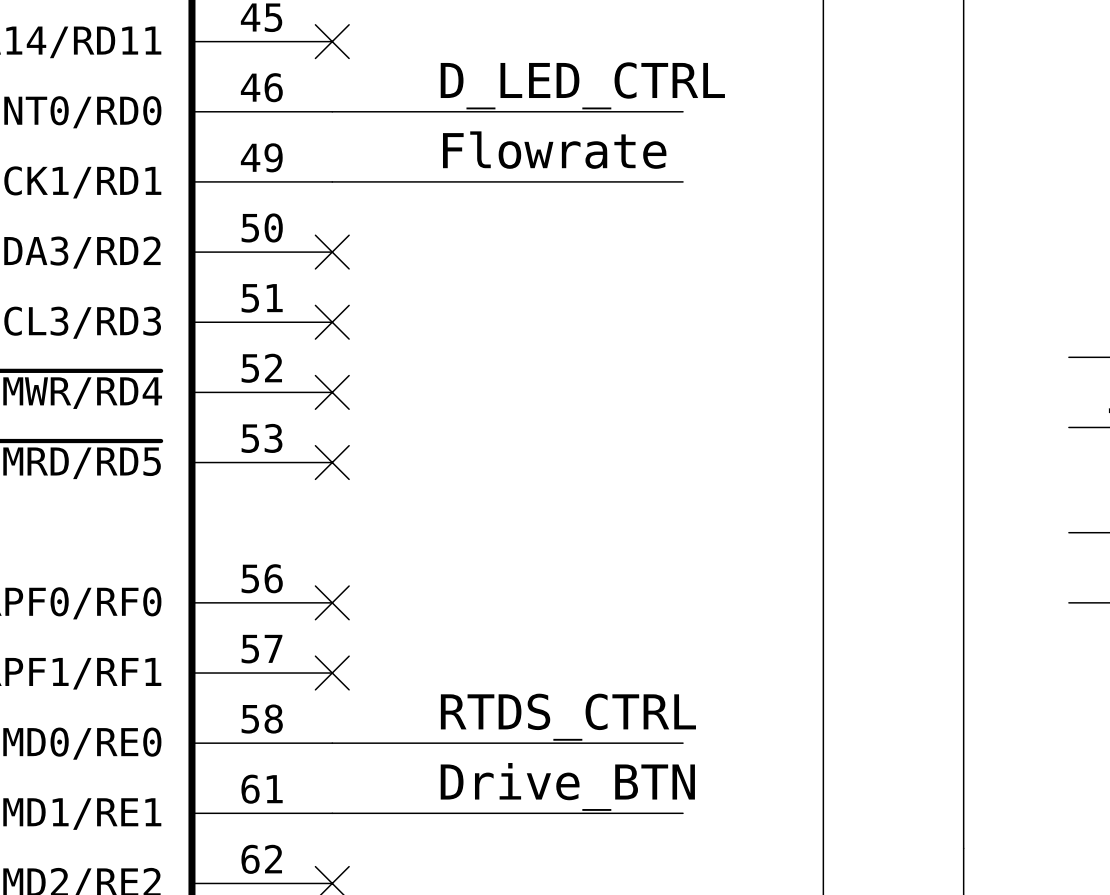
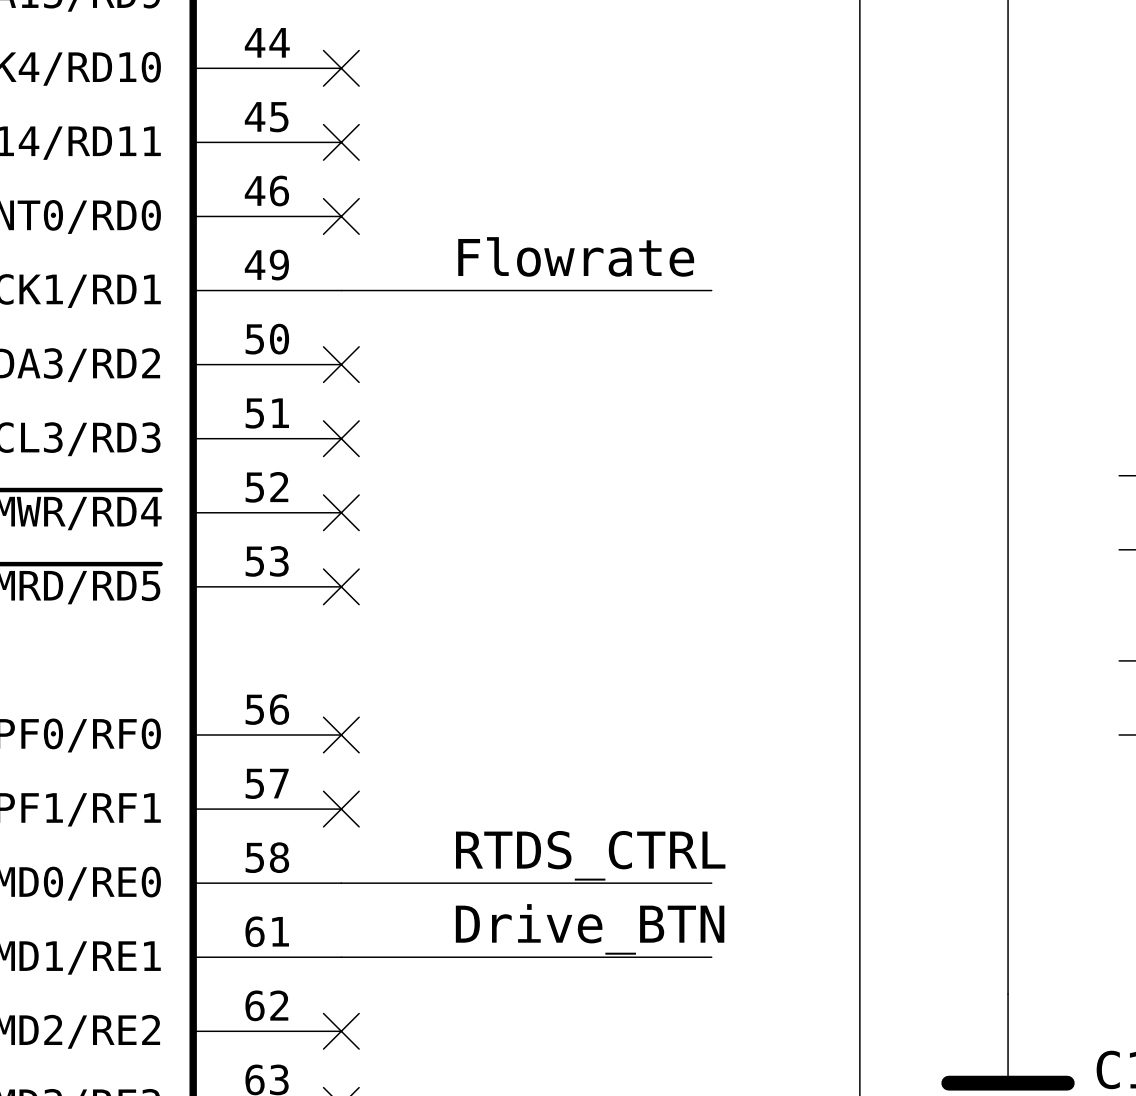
label: D_LED_CTRL (582, 85) -> none
wire: (332, 111) (683, 111) -> none
no-connect mark: none -> (341, 216)

